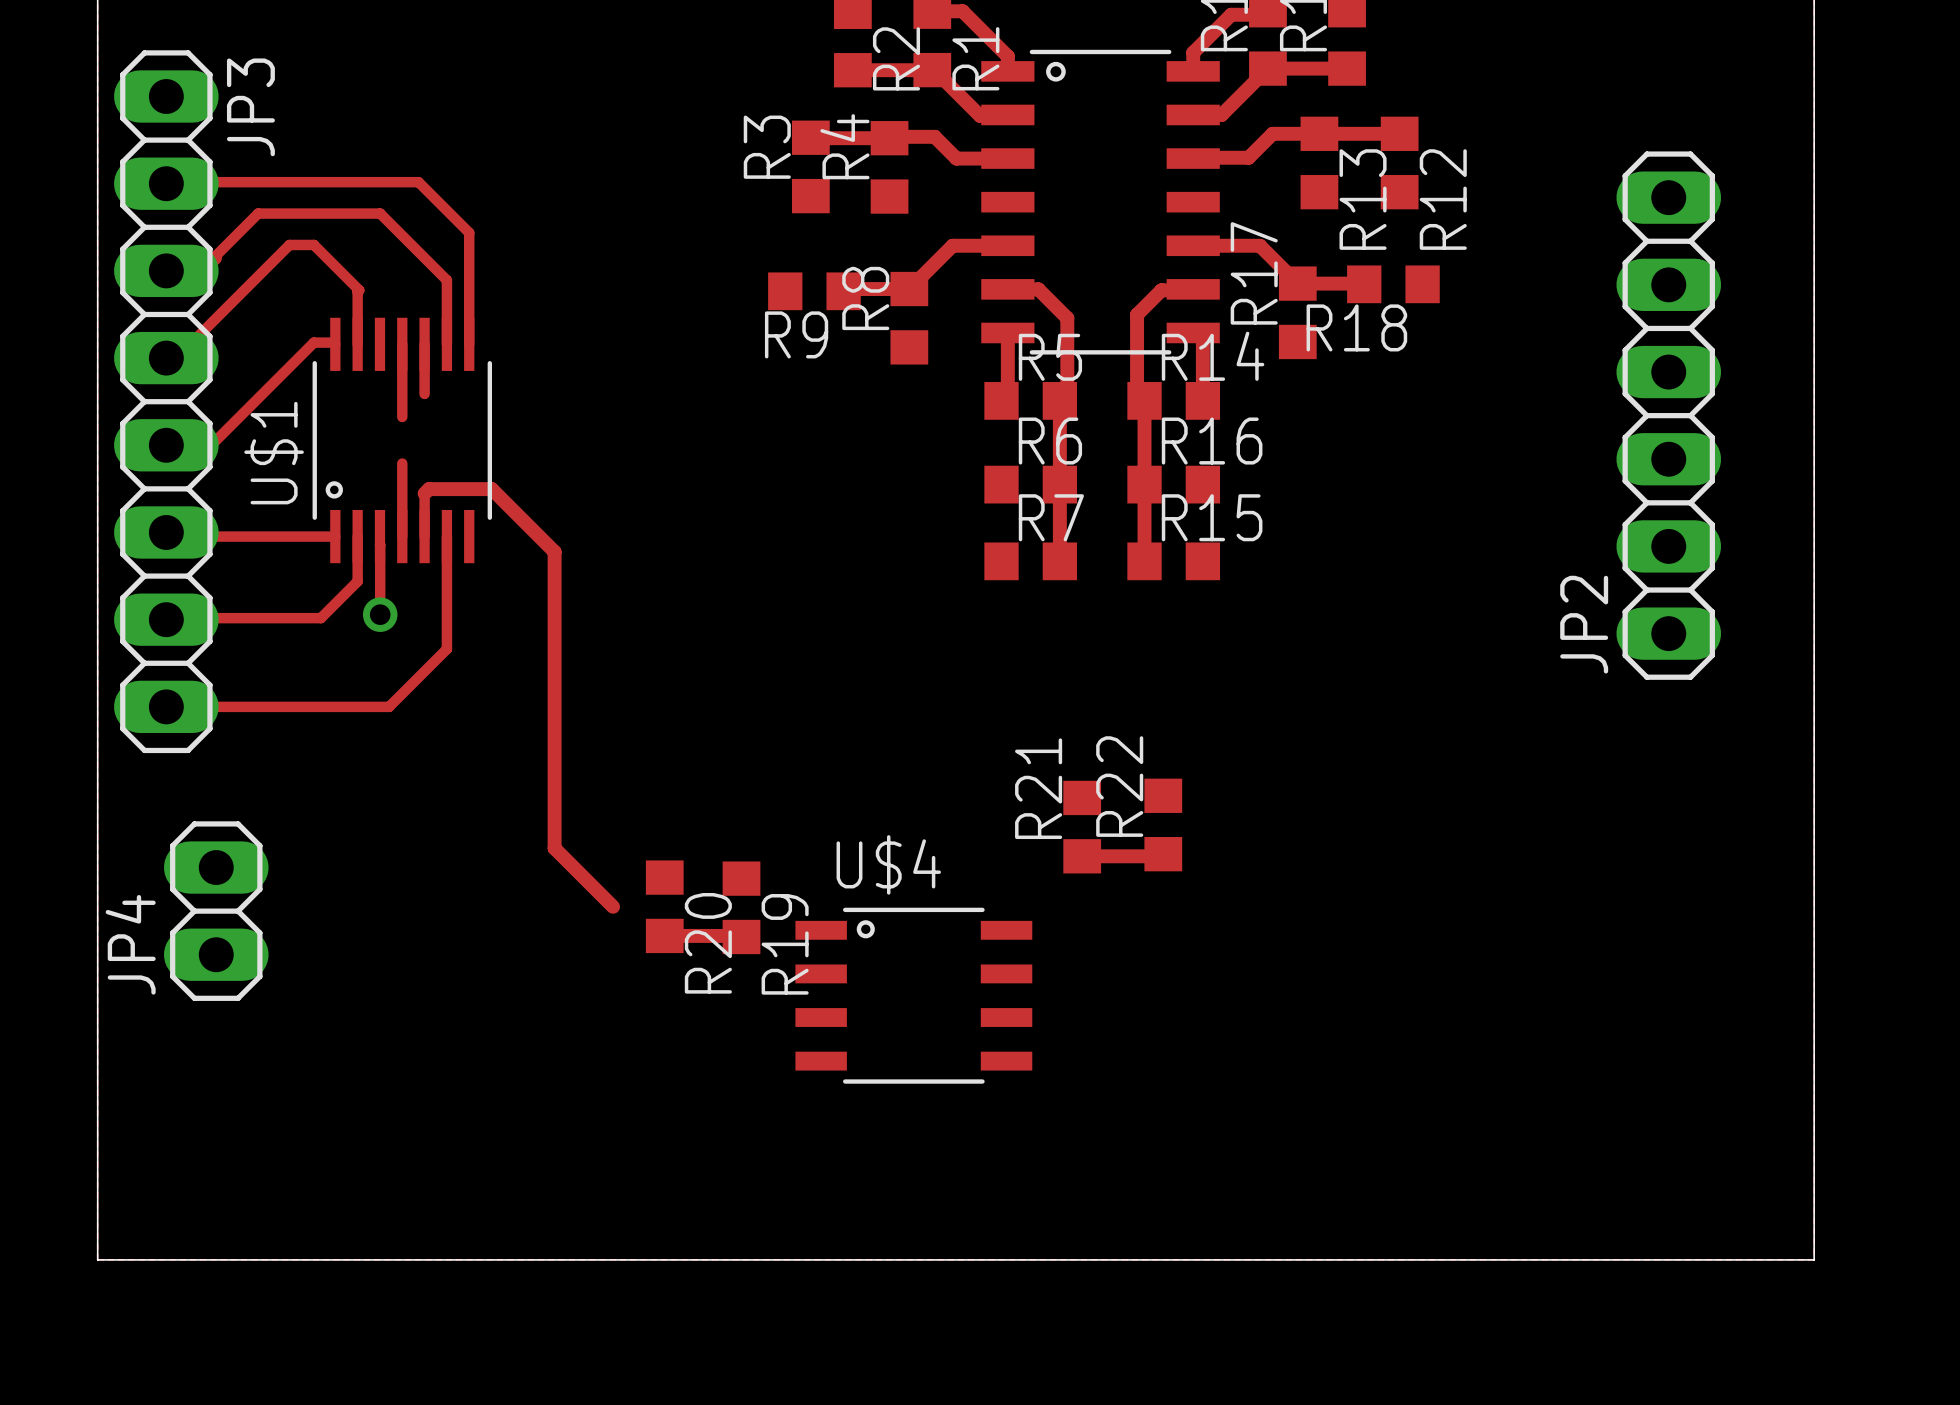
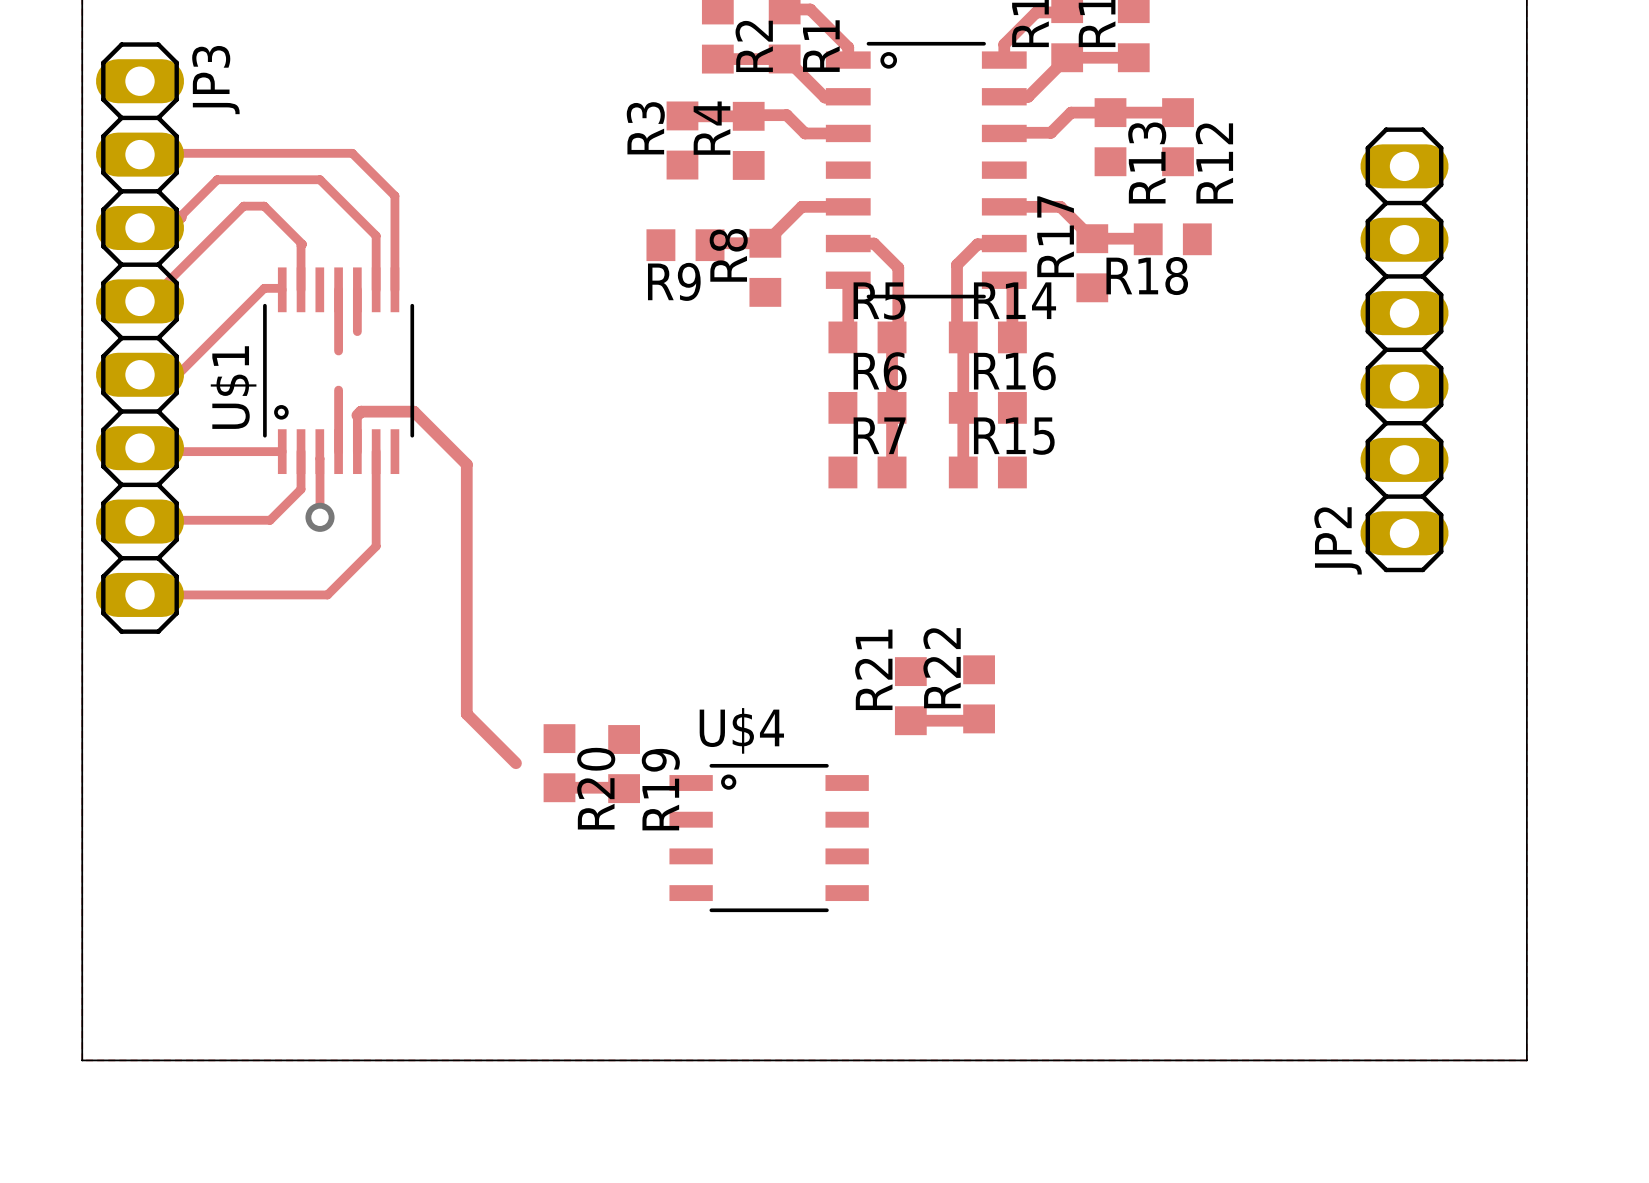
JP4: (216, 911) -> none

